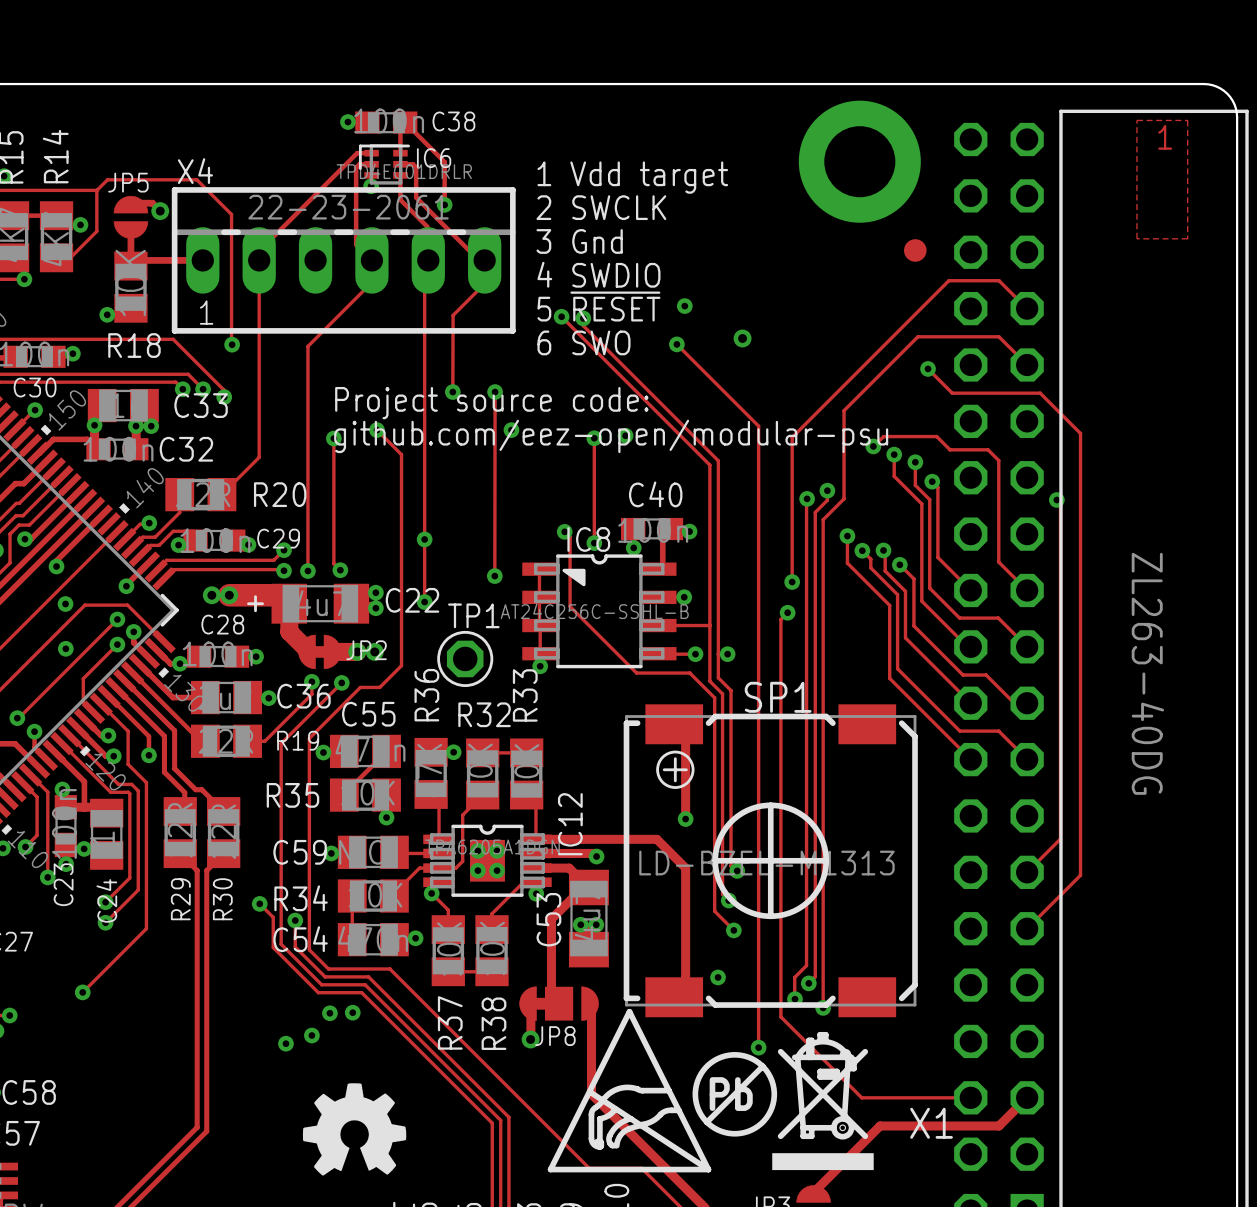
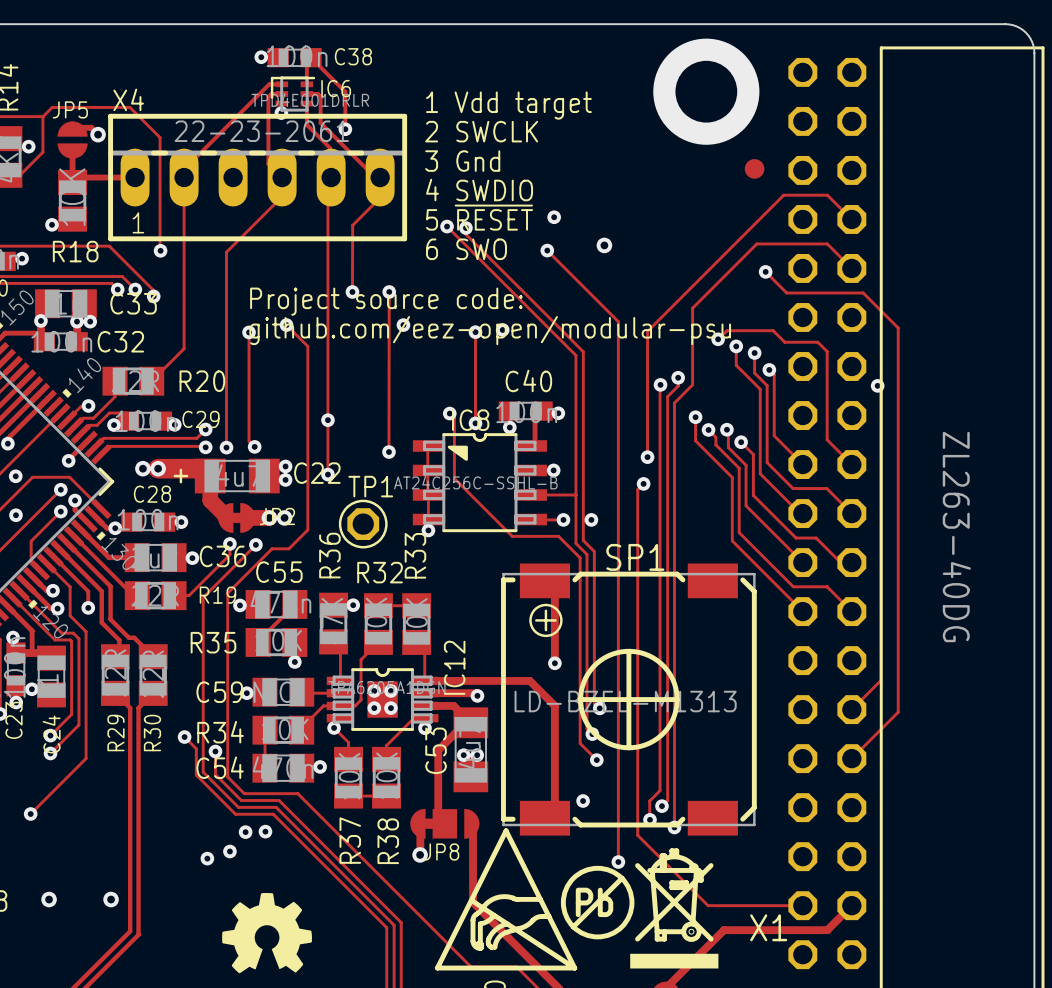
zone outline: (1136, 120) (1136, 238) (1187, 238) (1187, 120) (1136, 120) -> none
text: 1 (1165, 137) -> none
via: none -> (49, 899)
via: none -> (111, 899)

